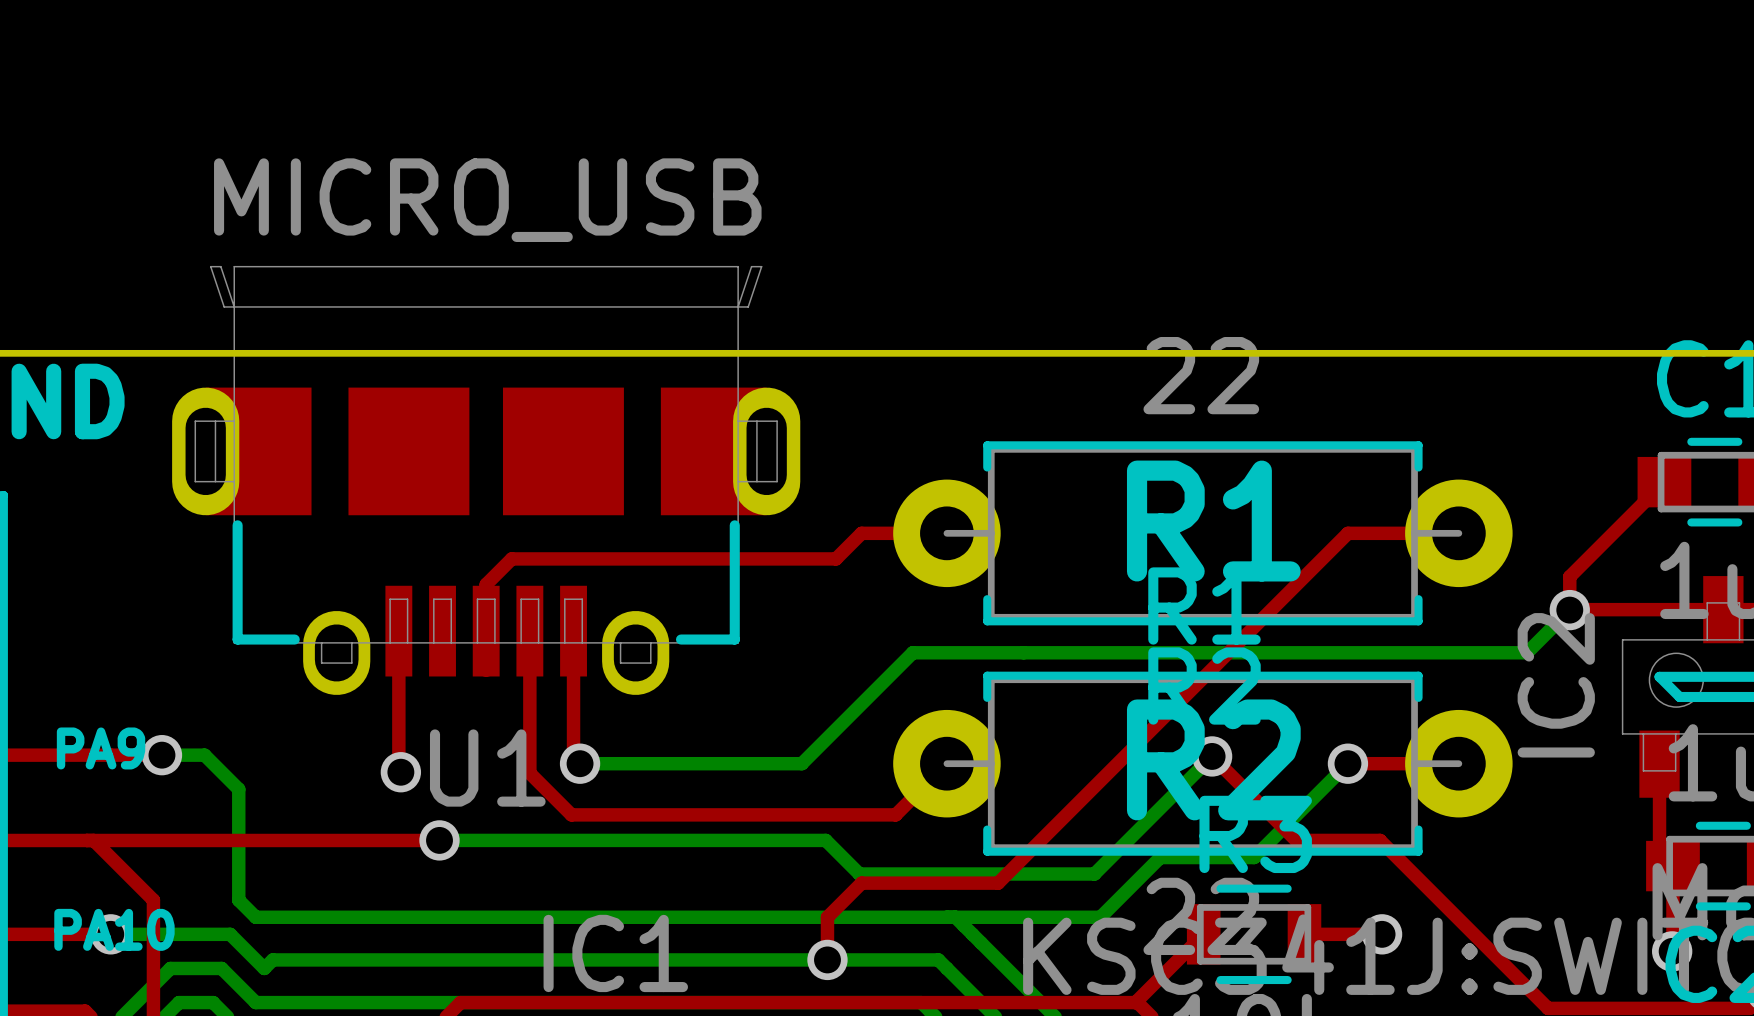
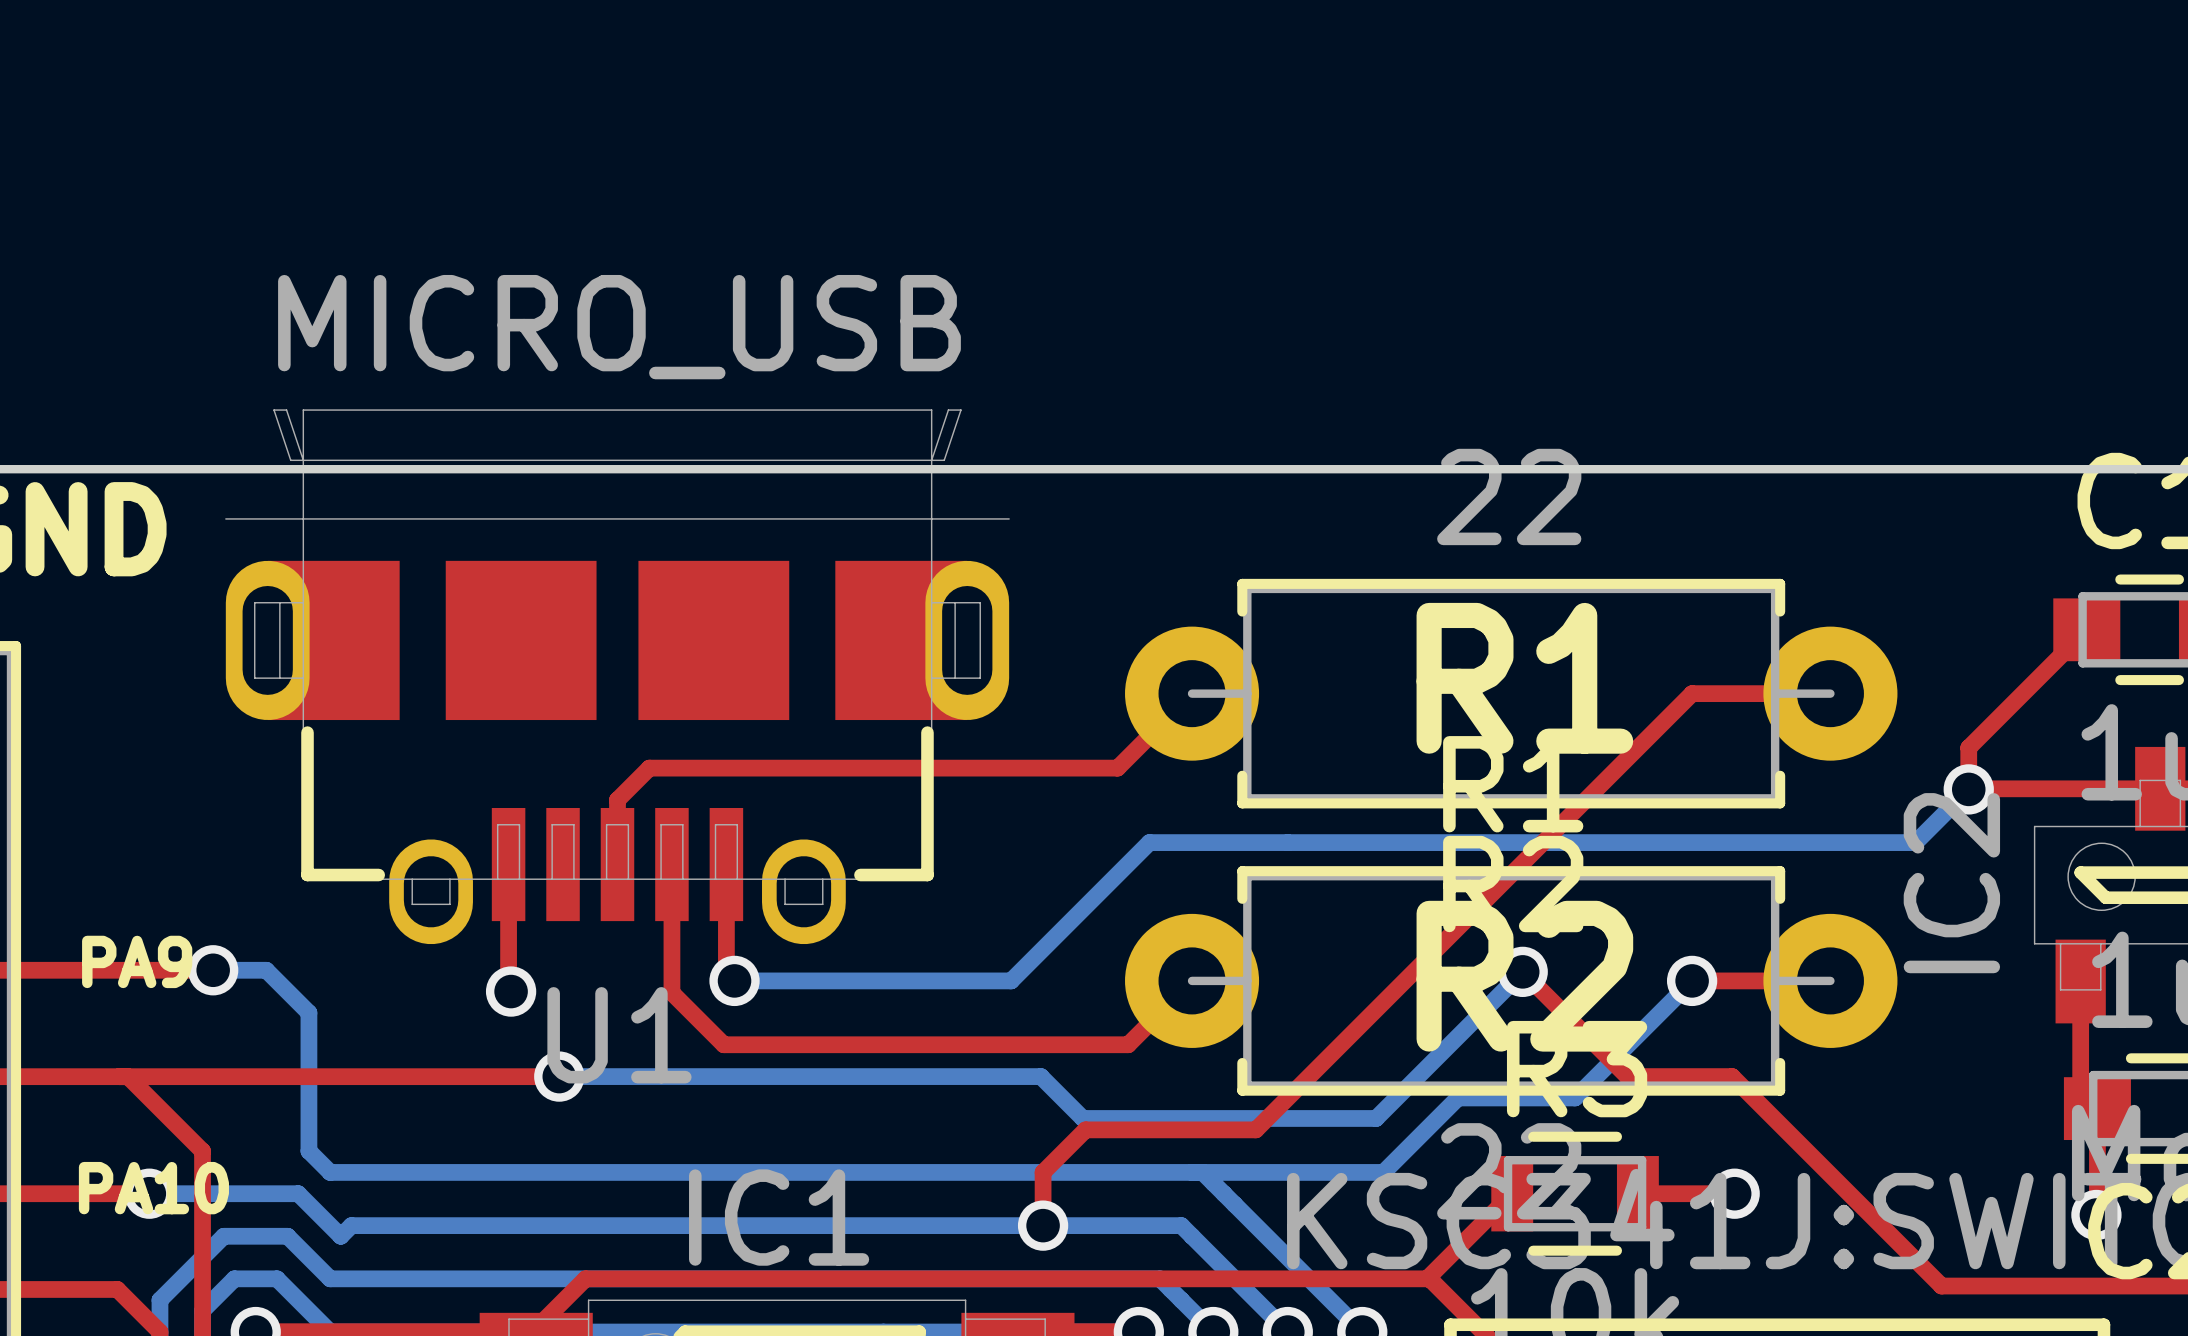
U1 position: (486, 480) -> (617, 676)
top track: (946, 533) (861, 533) (836, 558) (511, 558) (486, 584) (486, 618) -> (1192, 693) (1117, 768) (649, 768) (617, 800)

